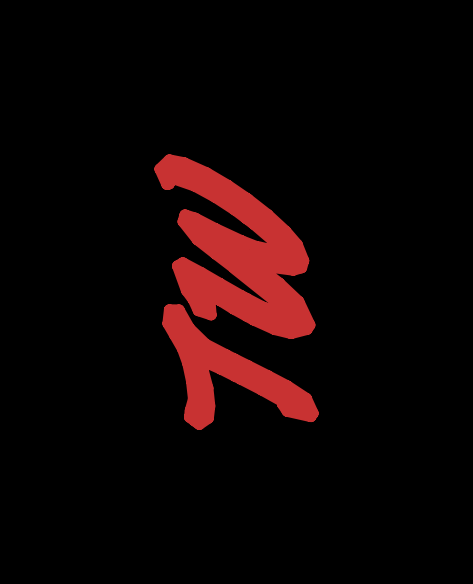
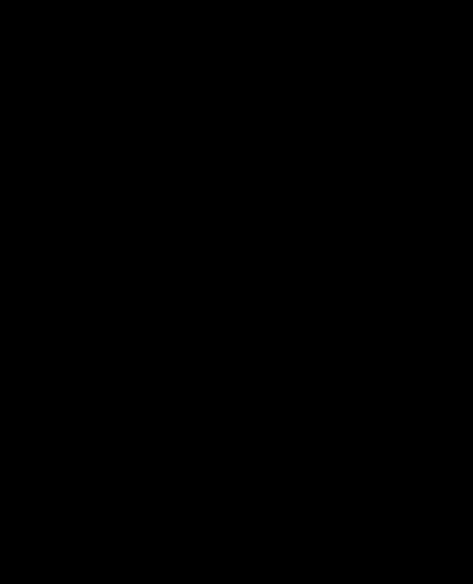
track: (169, 171) (174, 169) (193, 175) (227, 195) (261, 218) (281, 238) (286, 248) (290, 251) (287, 254) (295, 261) (252, 254) (250, 257) (194, 225) (210, 240) (275, 288) (287, 300) (300, 321) (290, 324) (267, 318) (244, 307) (228, 296) (204, 287) (200, 279) (189, 274) (203, 305) -> none
track: (255, 246) (185, 214) (183, 221) (197, 239) (233, 267) -> none
track: (257, 246) (278, 251) (272, 239) (235, 210) (194, 186) (173, 178) (166, 184) (159, 169) (169, 159) (184, 162) (206, 172) (248, 199) (285, 231) (297, 244) (303, 260) (301, 267) (293, 270) (273, 267) (253, 261) (298, 301) (309, 325) (307, 329) (291, 333) (274, 329) (253, 319) (207, 293) (209, 297) (211, 314) (198, 310) (186, 290) (177, 265) (182, 262) (263, 307) (289, 315) (277, 302) (234, 268) -> none
track: (169, 309) (179, 309) (189, 328) (205, 344) (287, 386) (306, 398) (313, 413) (310, 416) (287, 411) (282, 401) (200, 360) (207, 387) (209, 406) (208, 418) (199, 424) (189, 417) (193, 398) (191, 381) (182, 348) (167, 323) (169, 309) -> none
track: (300, 398) (303, 407) (292, 402) (293, 399) (281, 390) (265, 381) (204, 355) (176, 319) (188, 341) (194, 360) (200, 391) (201, 404) (199, 413) -> none

